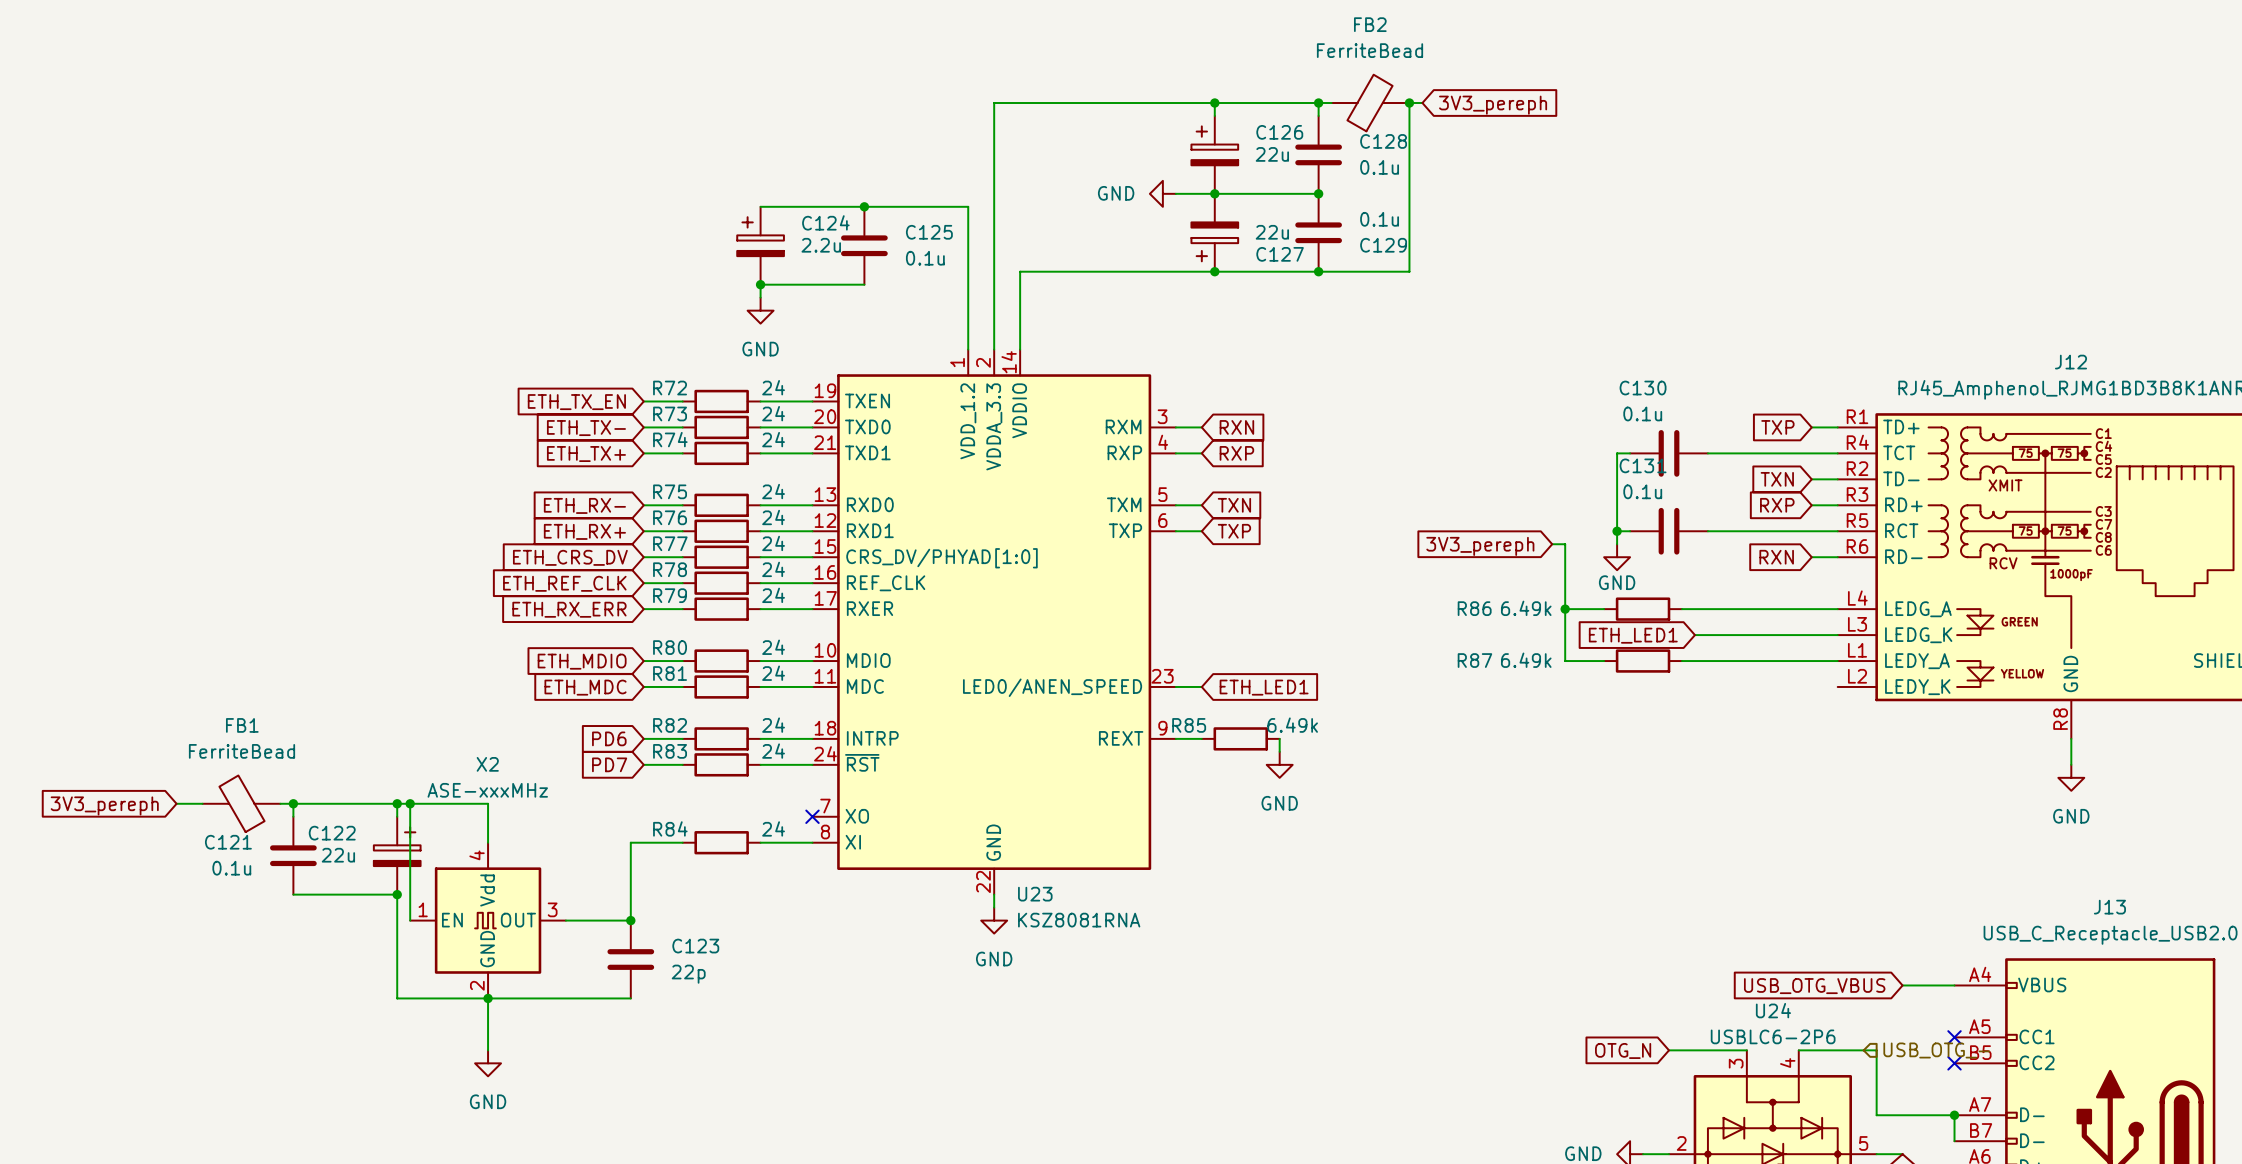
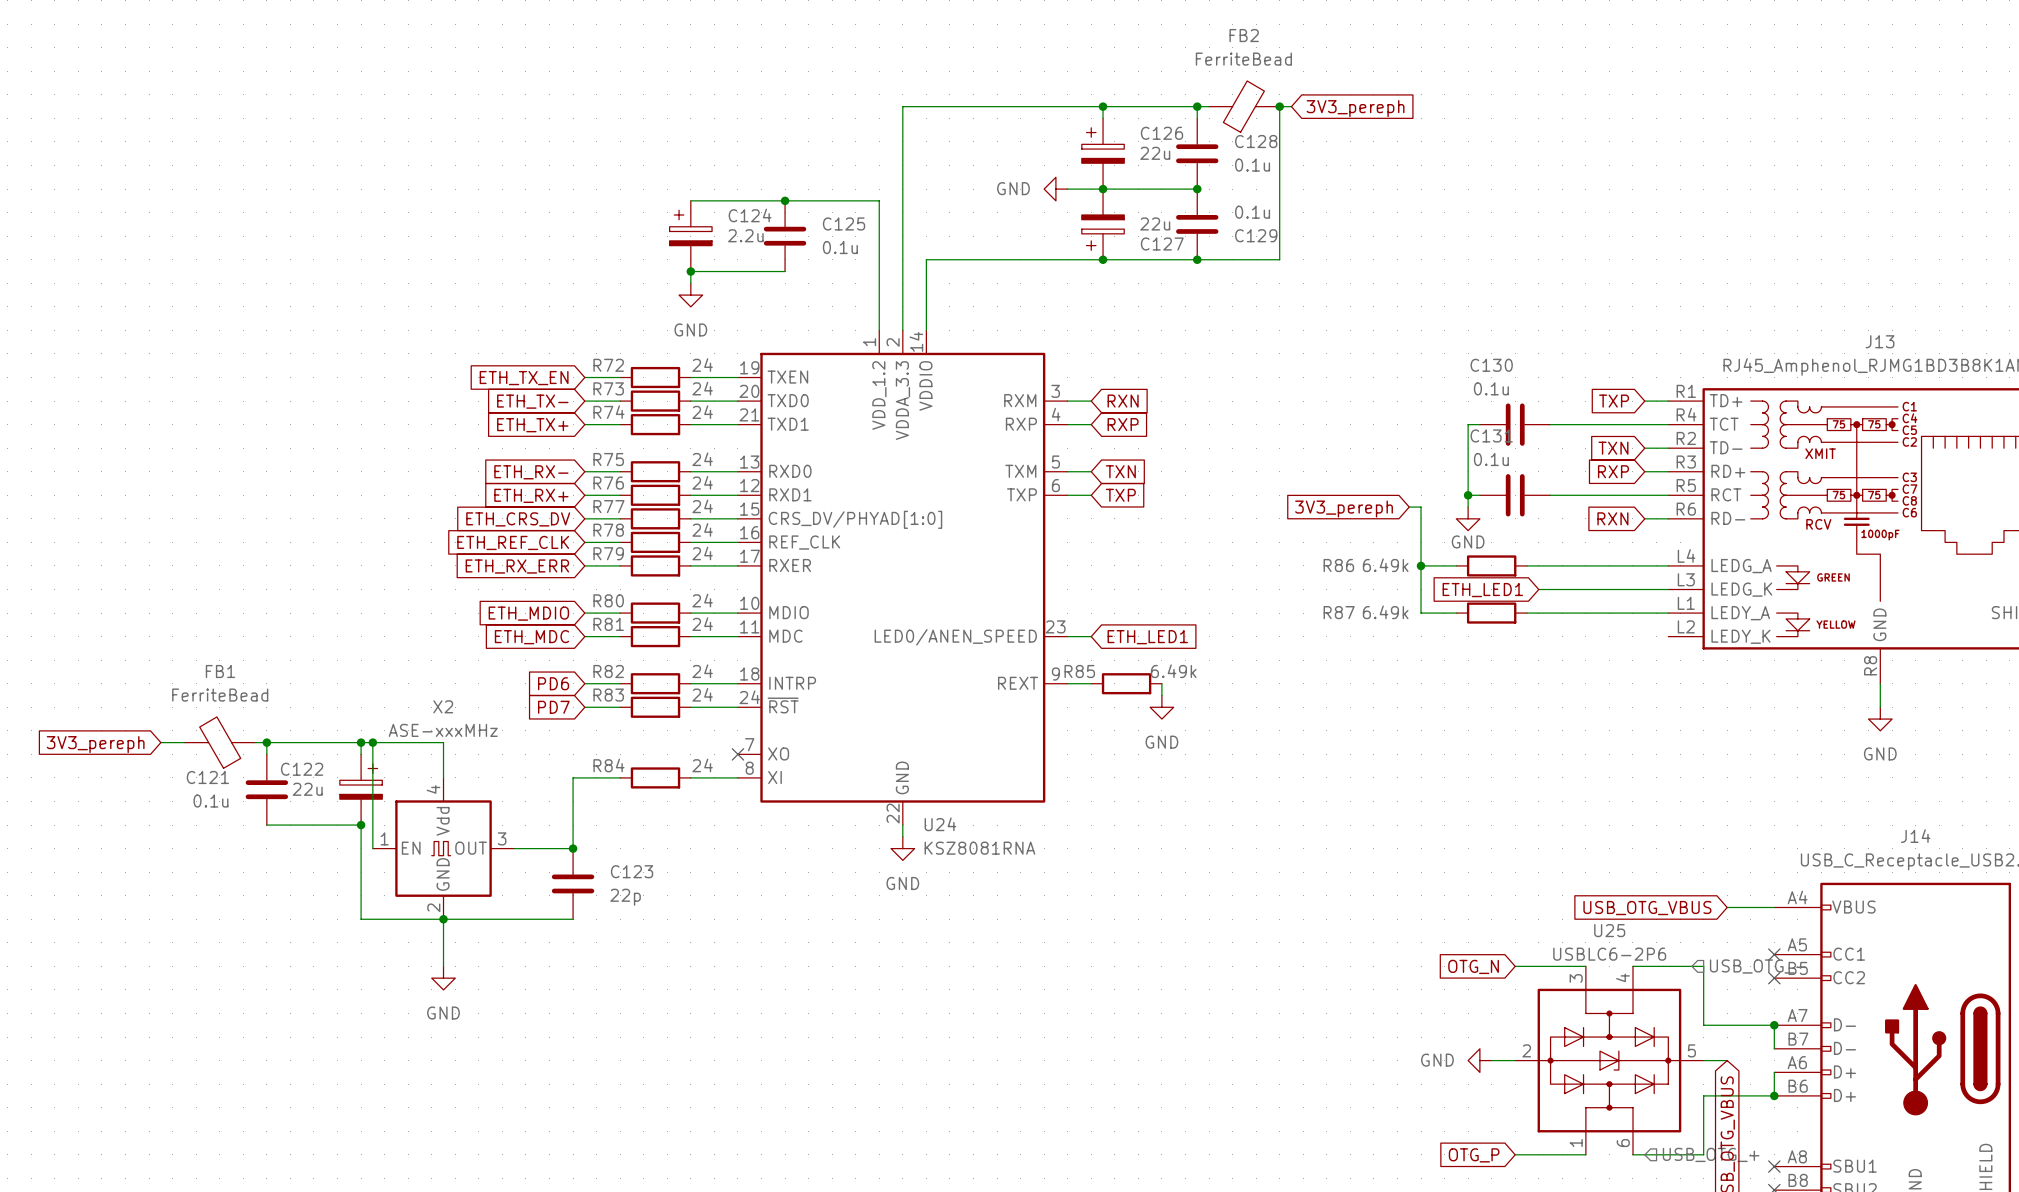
J12 name: J12 (2071, 362) -> J13 (1880, 341)
U23 name: U23 (1035, 894) -> U24 (940, 824)
J13 name: J13 (2109, 907) -> J14 (1915, 836)
U24 name: U24 (1773, 1010) -> U25 (1609, 930)

